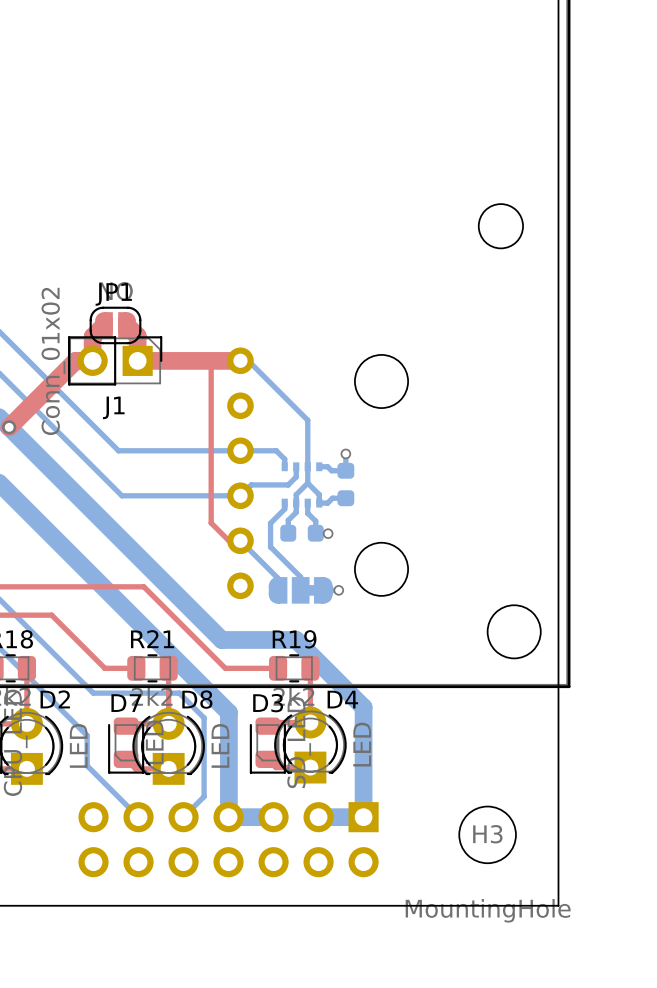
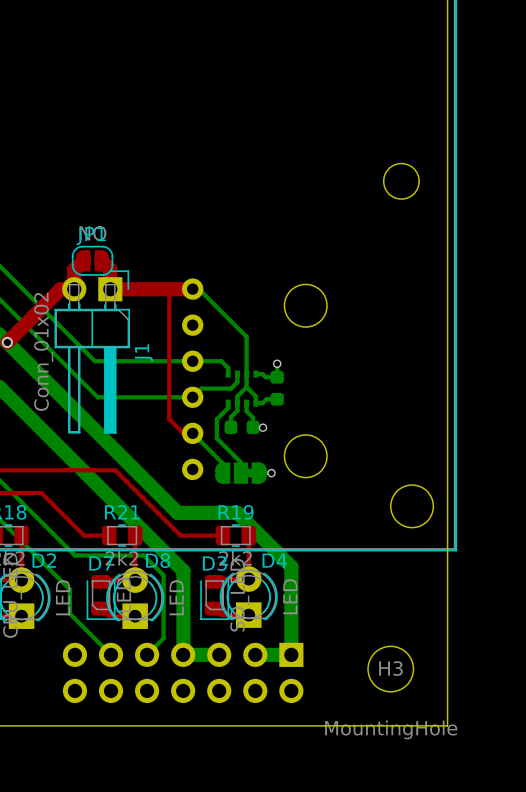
J1 footprint: [68, 336, 163, 386] -> [54, 270, 131, 434]
J1 name position: J1 (113, 407) -> J1 (143, 352)

